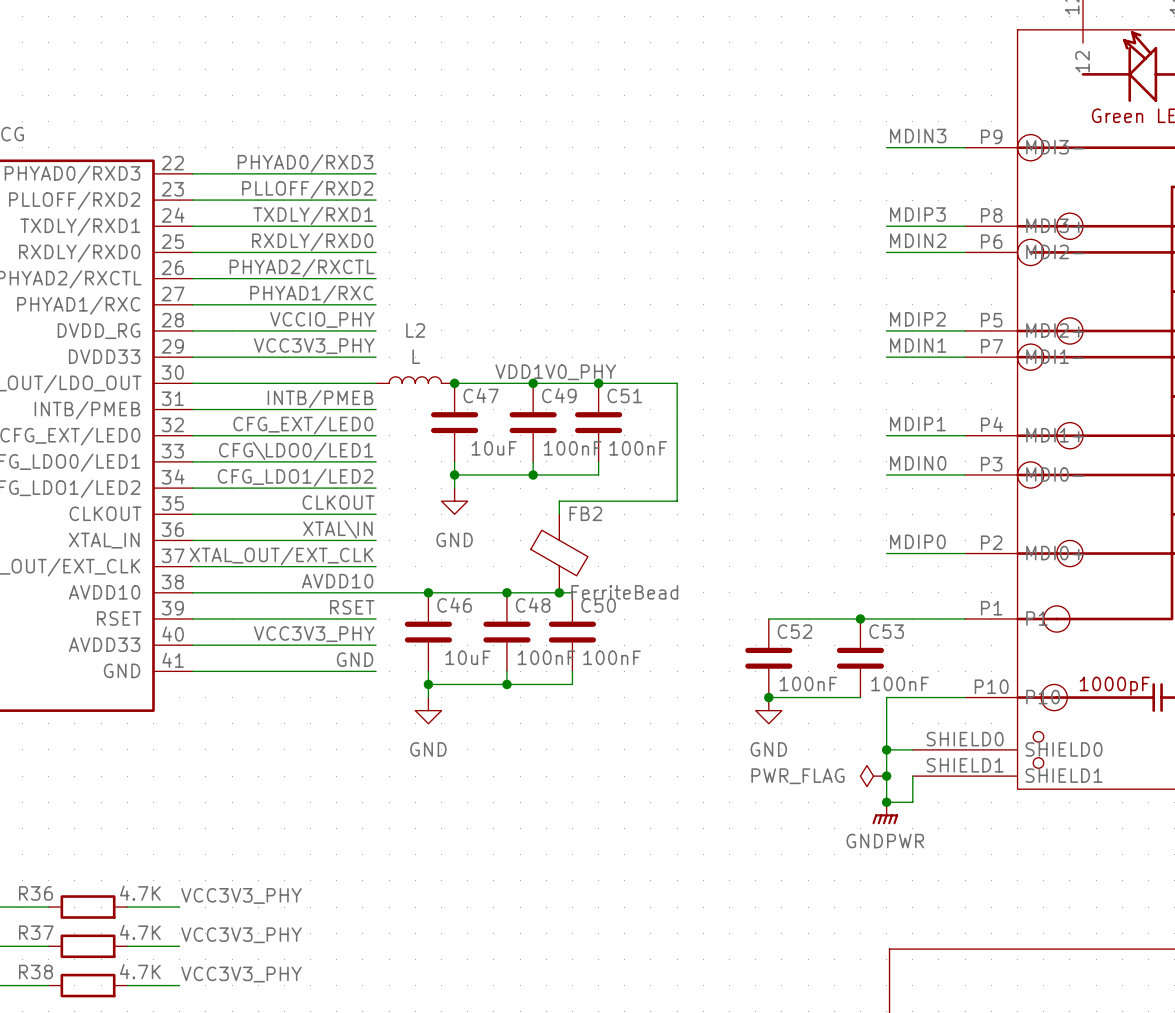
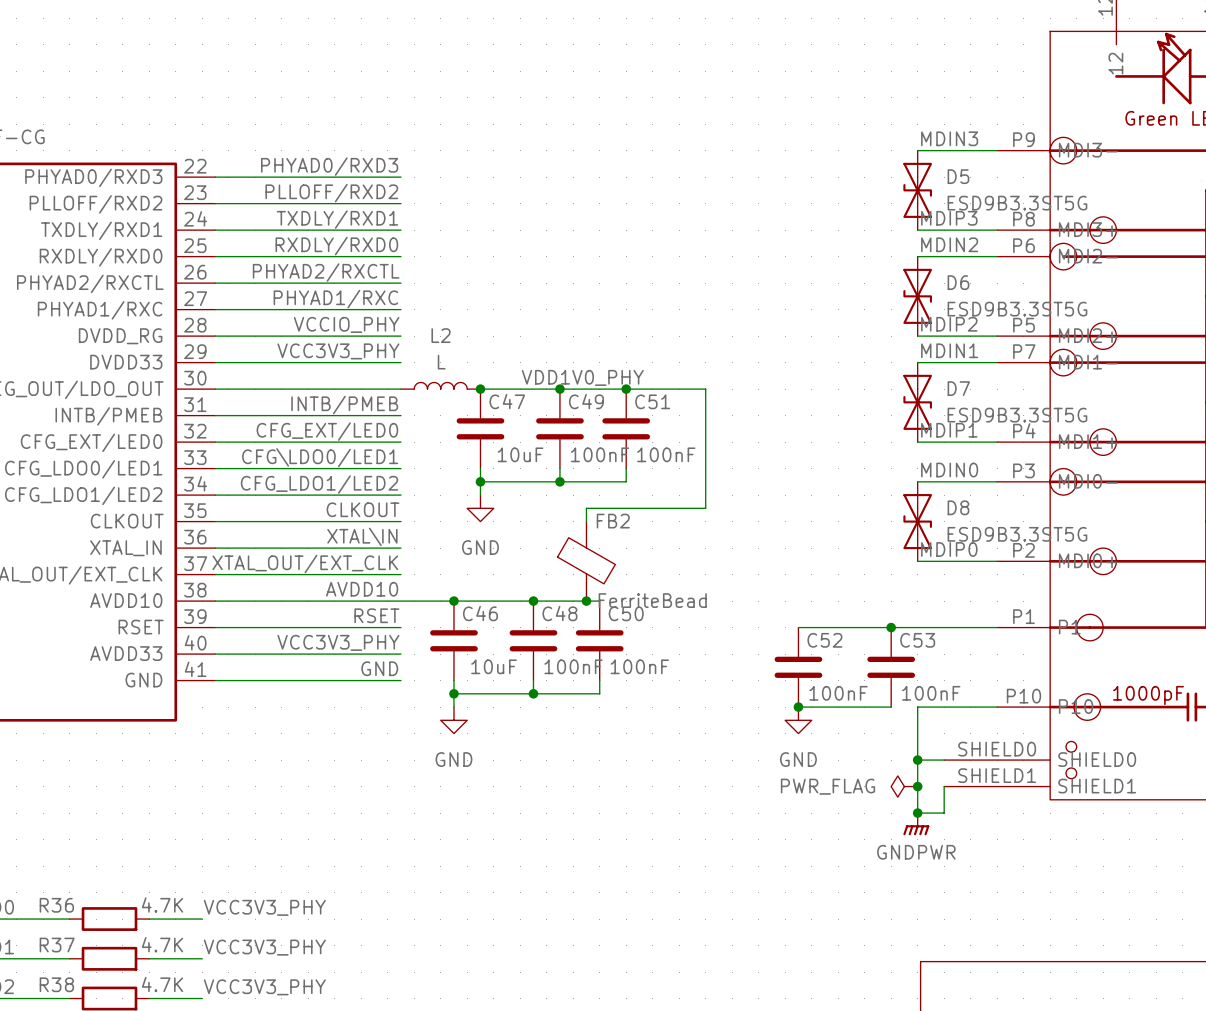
D5: none -> ESD9B3.3ST5G (917, 190)
D6: none -> ESD9B3.3ST5G (917, 296)
D7: none -> ESD9B3.3ST5G (917, 402)
D8: none -> ESD9B3.3ST5G (917, 521)

